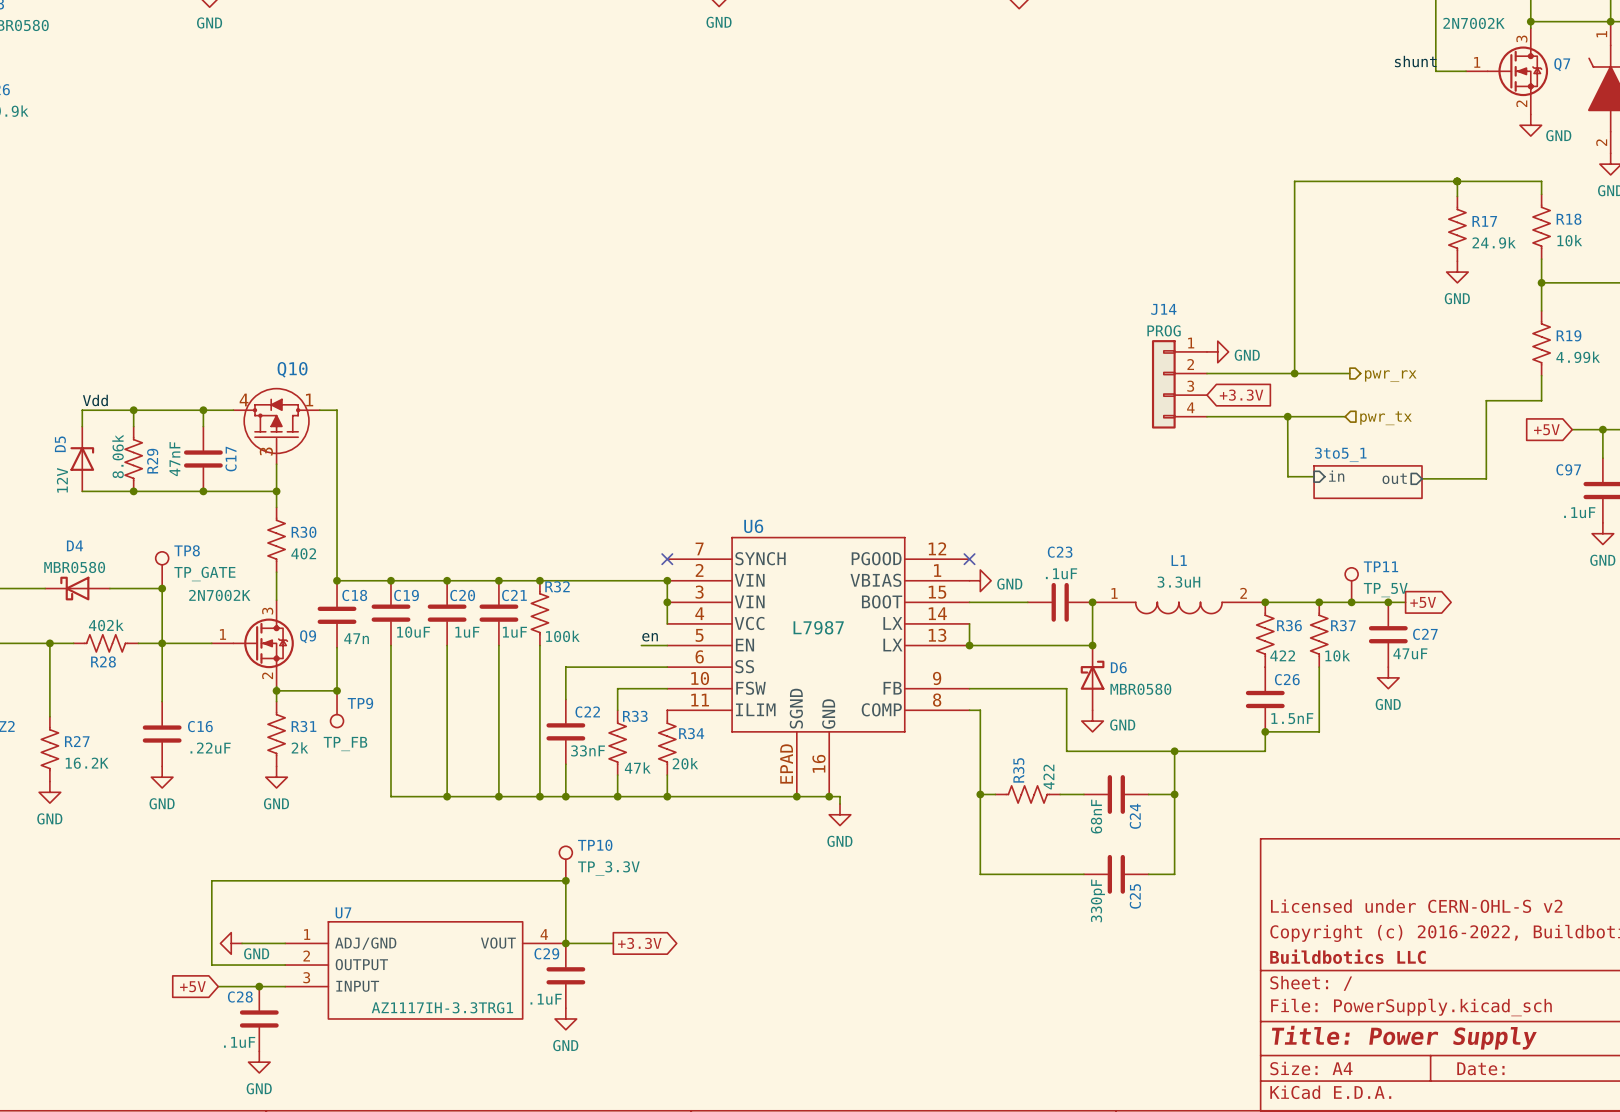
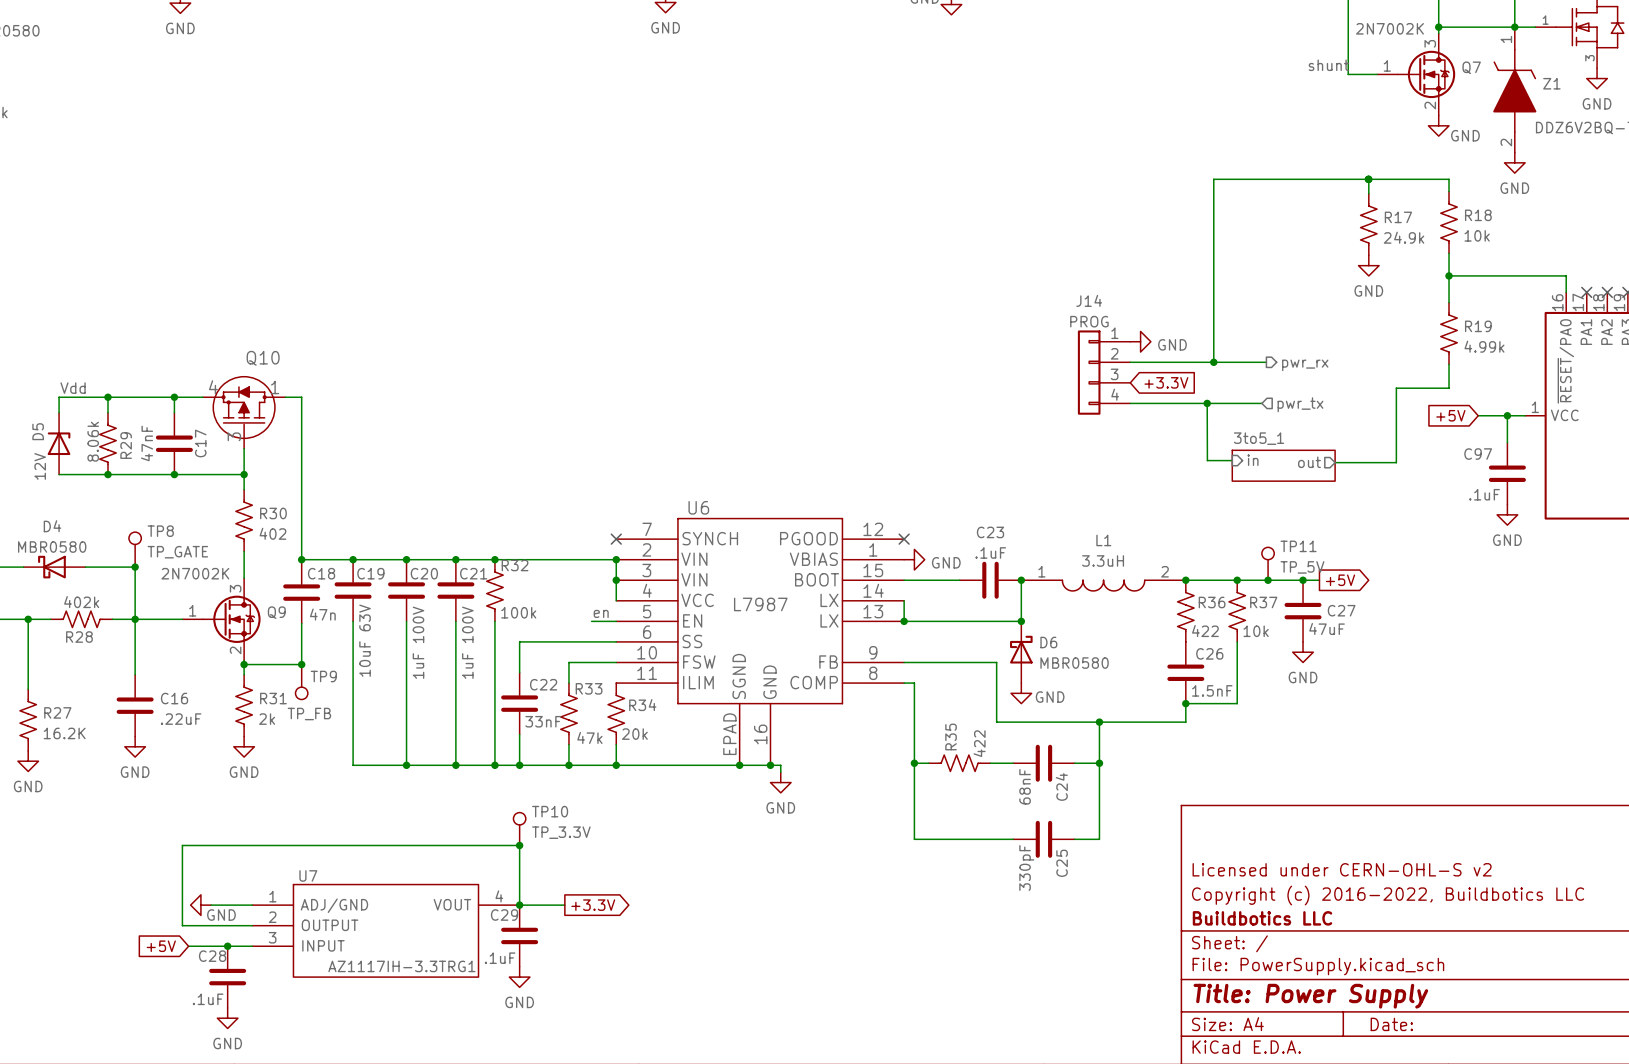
C19 value: 10uF (413, 632) -> 10uF 63V (365, 640)
C20 value: 1uF (467, 632) -> 1uF 100V (418, 642)
C21 value: 1uF (514, 632) -> 1uF 100V (467, 642)

